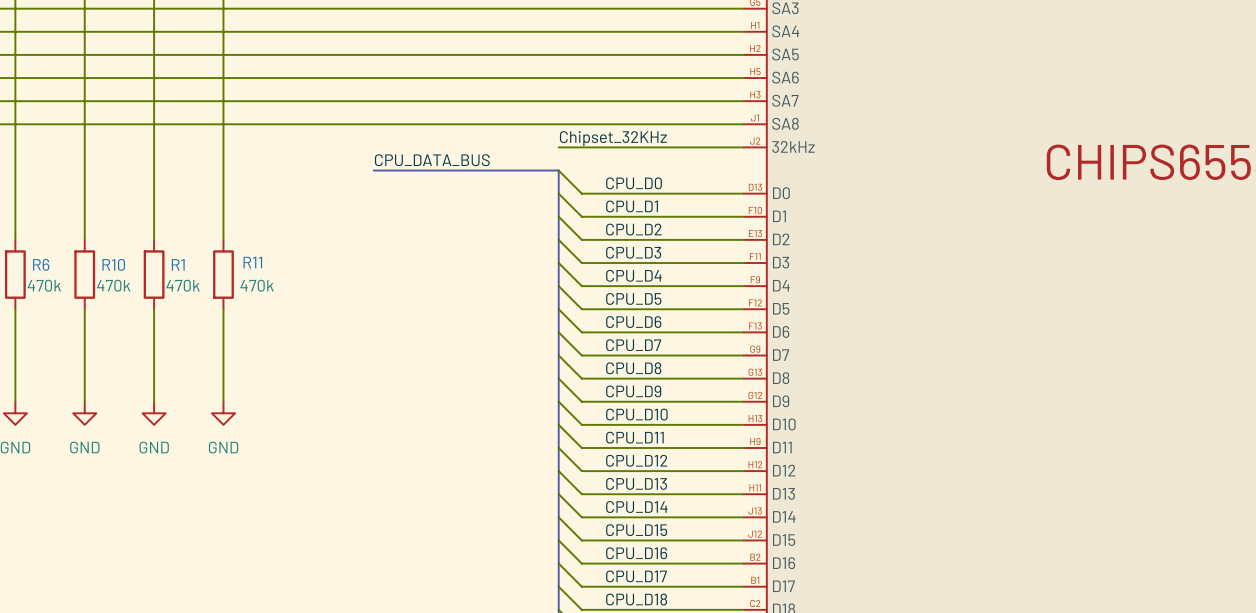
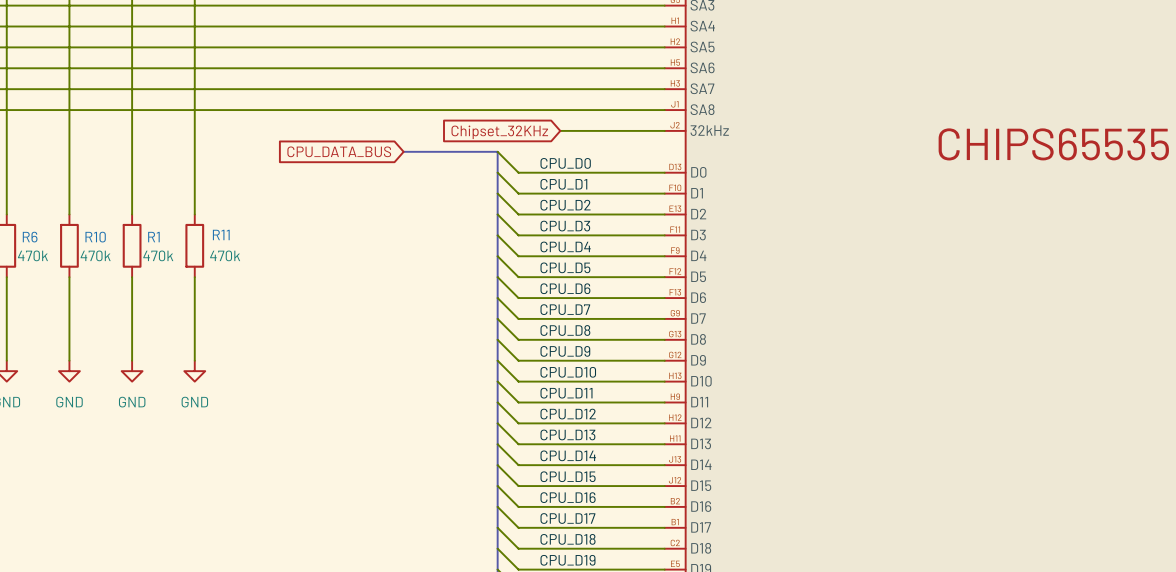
label: Chipset_32KHz (613, 138) -> none
wire: (558, 147) (628, 147) -> none
global label: none -> Chipset_32KHz (499, 132)
label: CPU_DATA_BUS (432, 160) -> none
bus: (373, 170) (454, 170) -> none
global label: none -> CPU_DATA_BUS (339, 151)

